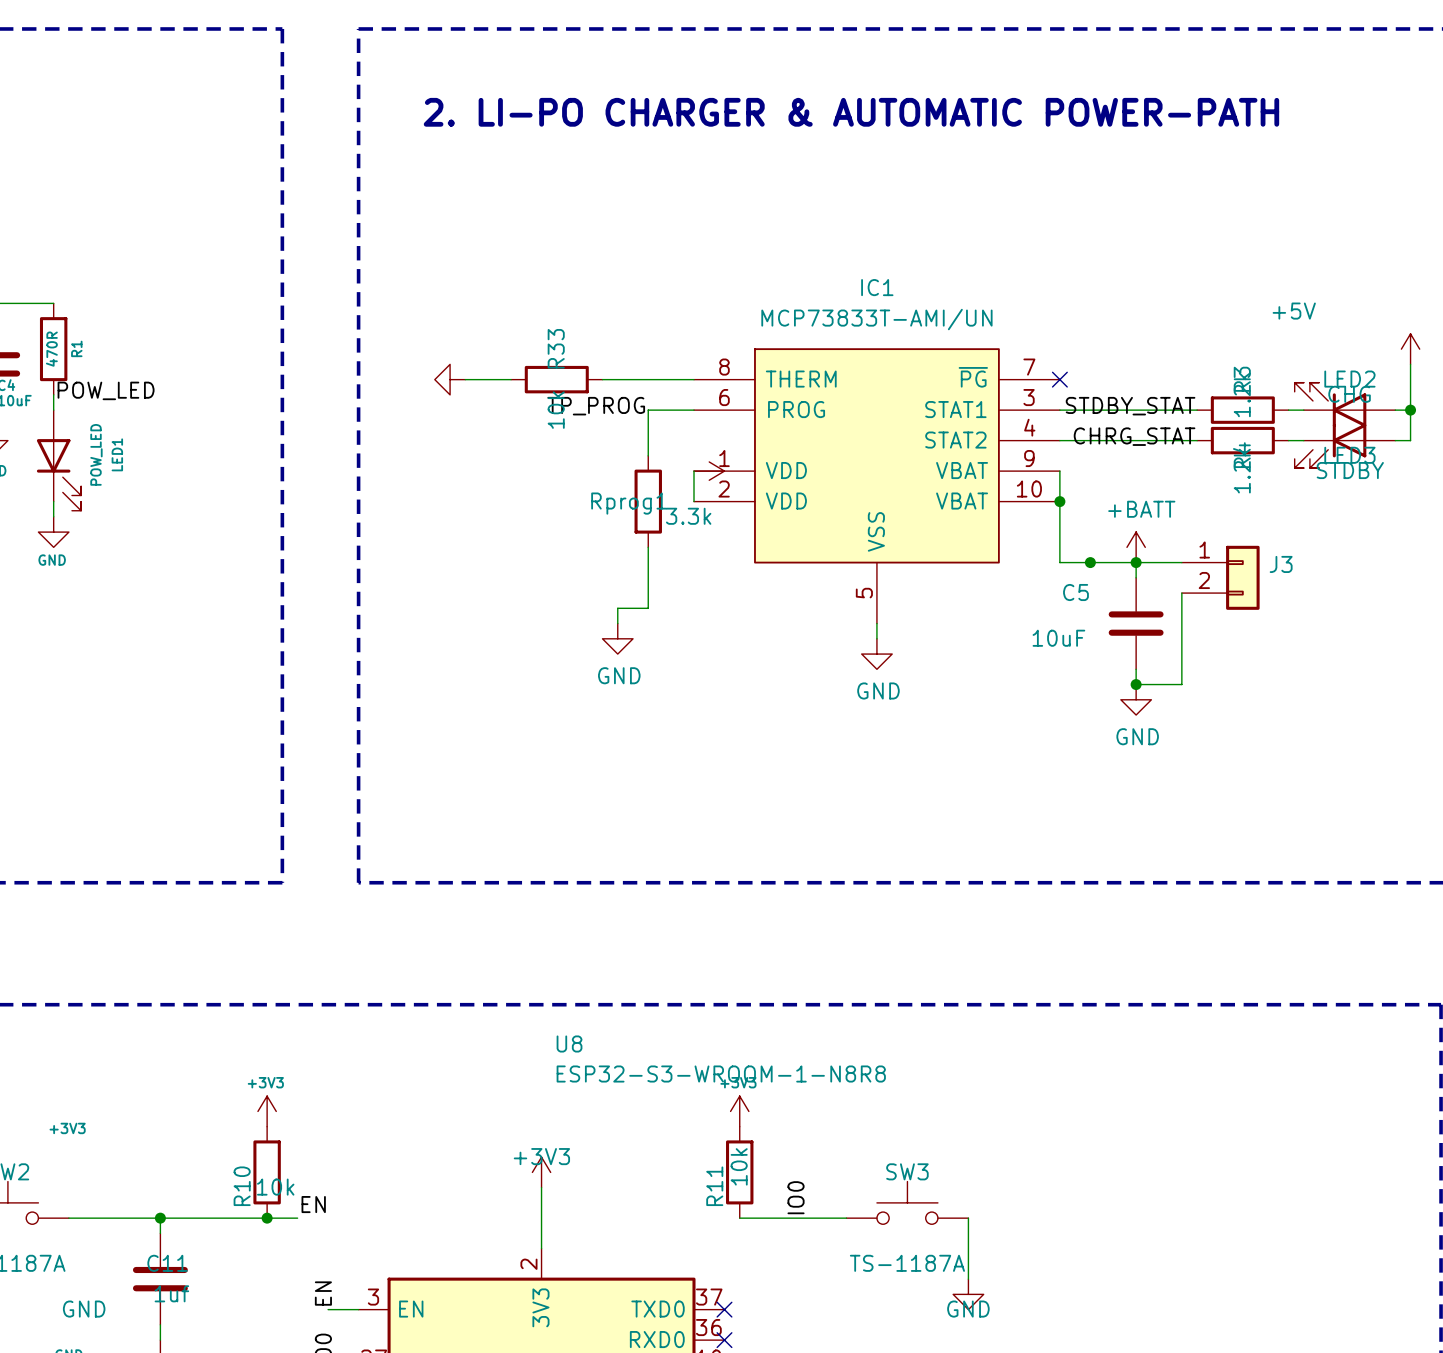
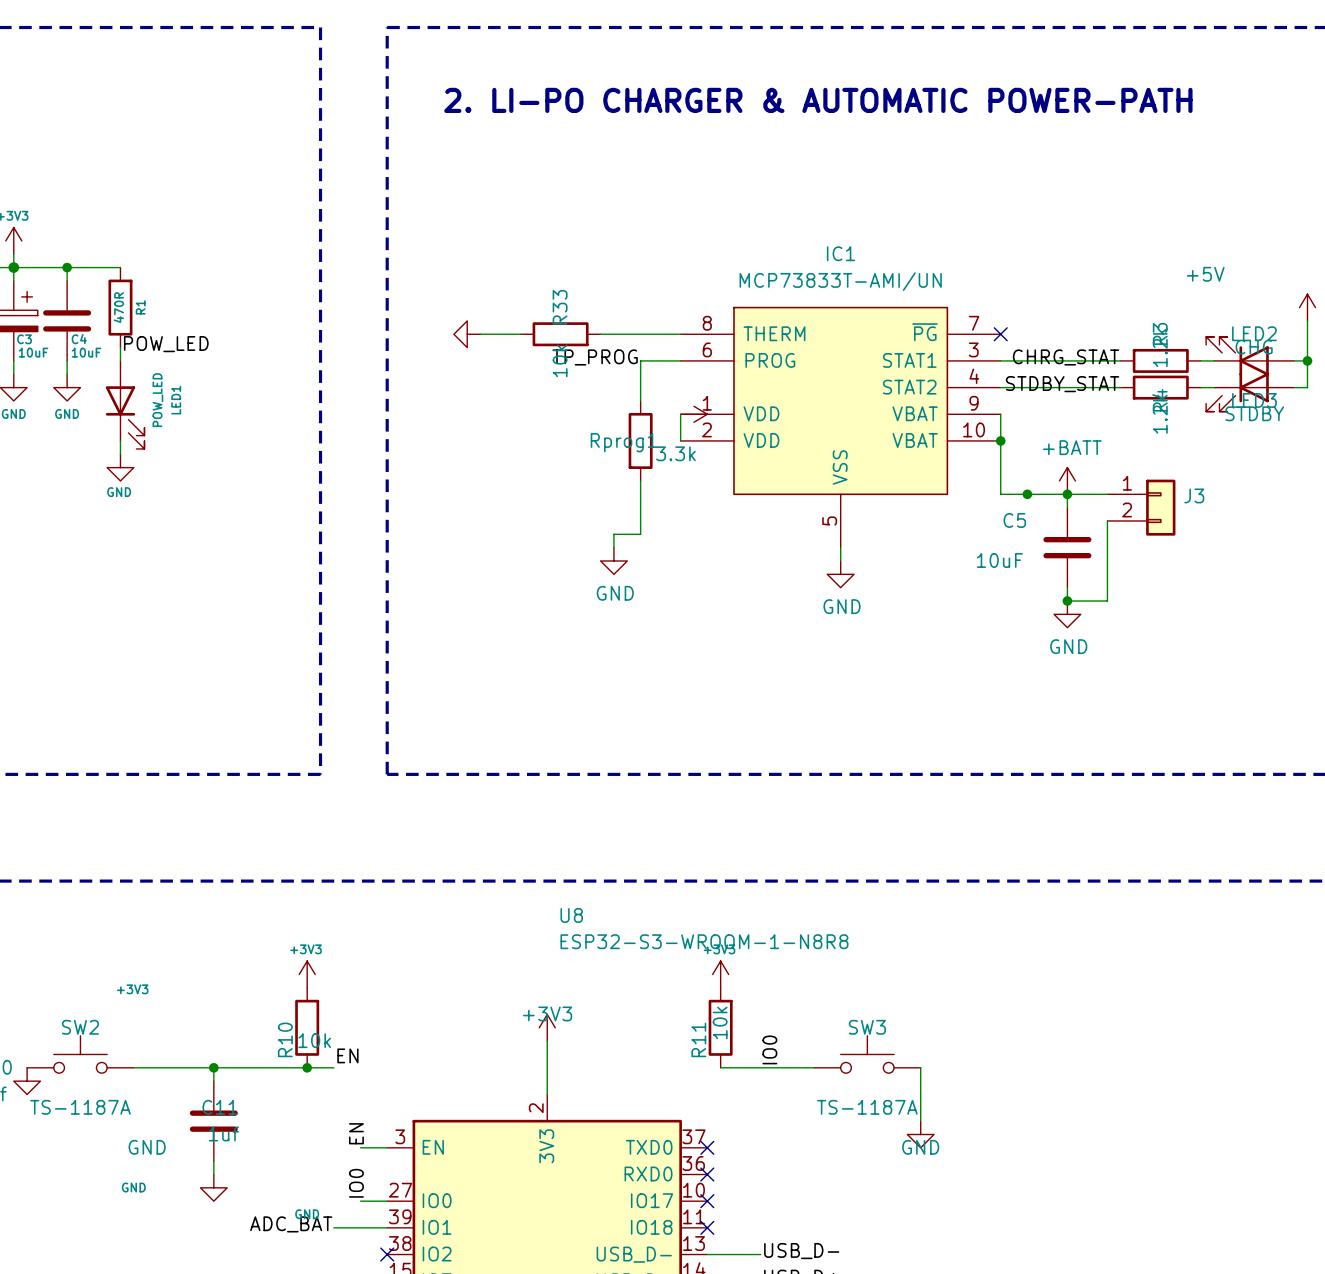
label: STDBY_STAT (1130, 406) -> CHRG_STAT (1066, 357)
label: CHRG_STAT (1134, 436) -> STDBY_STAT (1062, 384)

